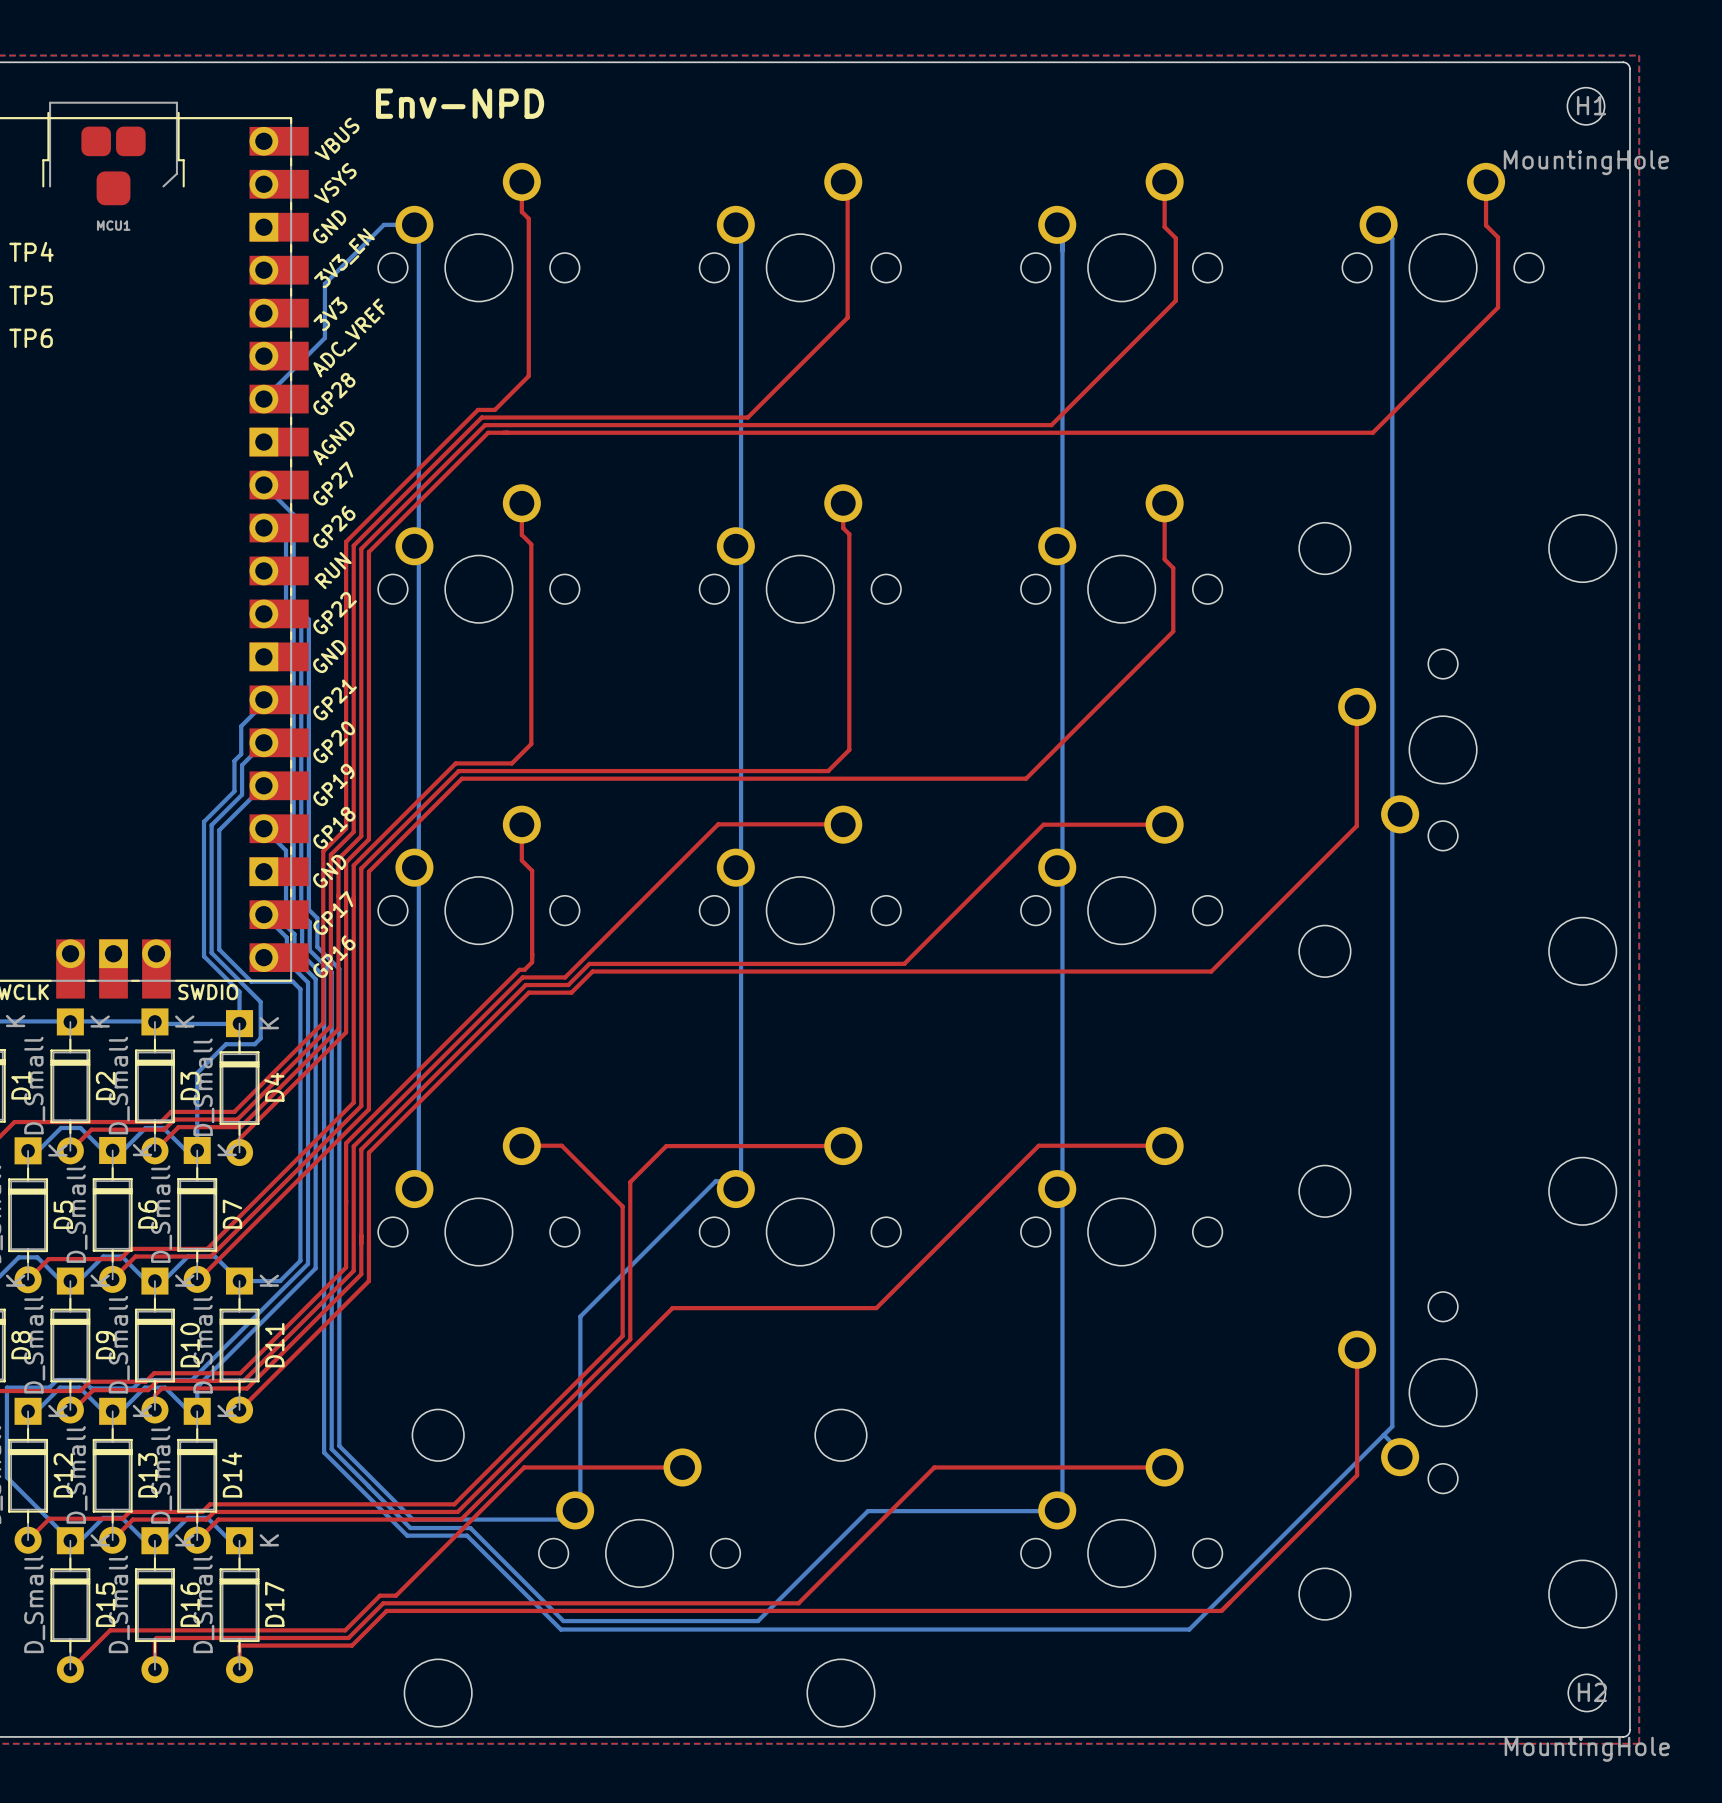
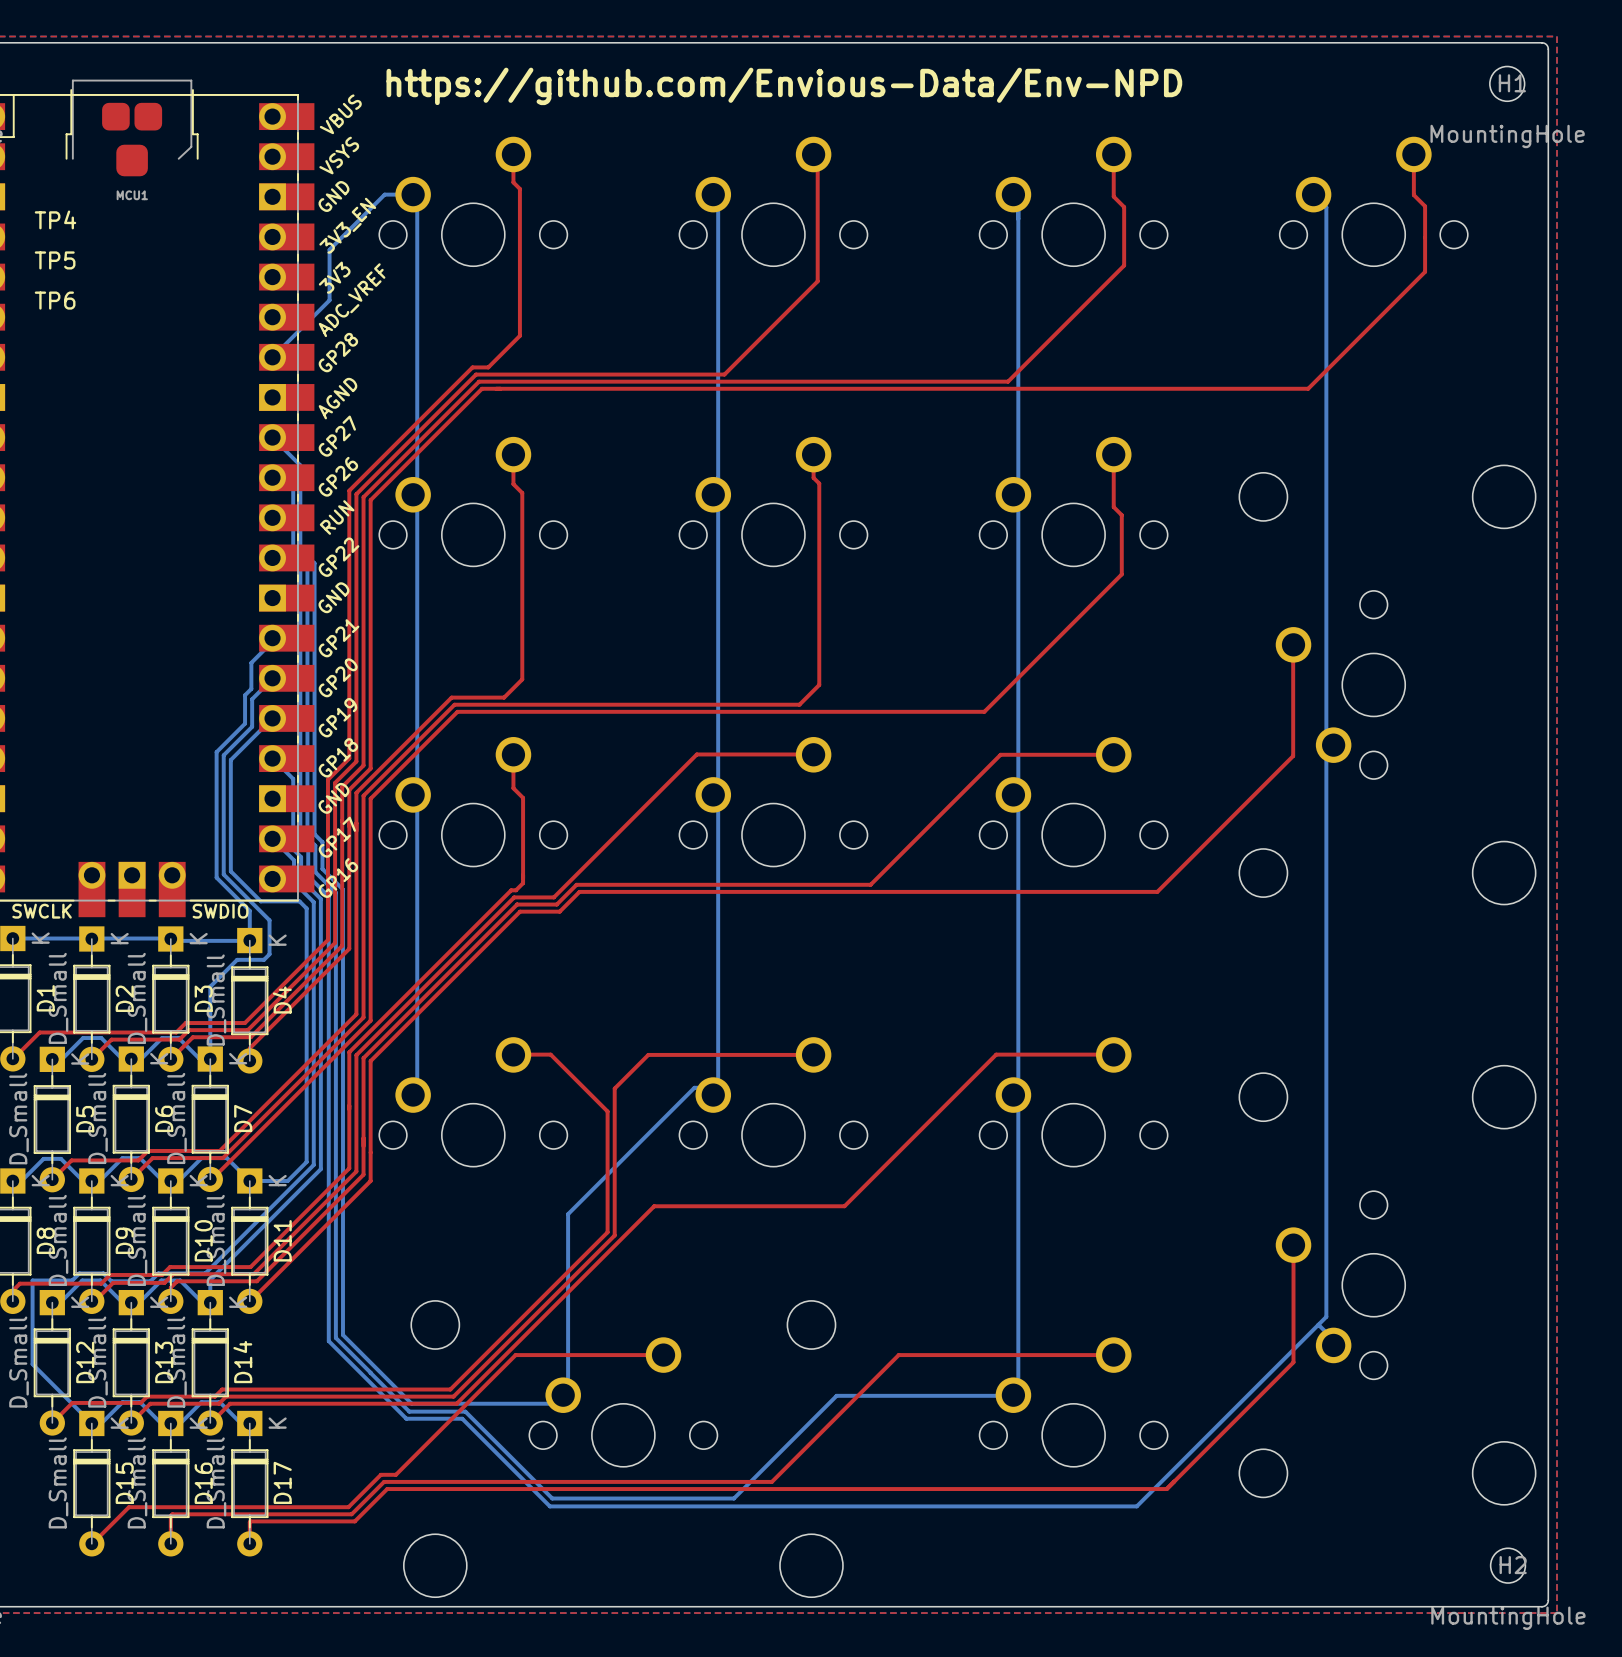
text: Env-NPD (460, 103) -> none
text: none -> https://github.com/Envious-Data/Env-NPD (784, 86)

